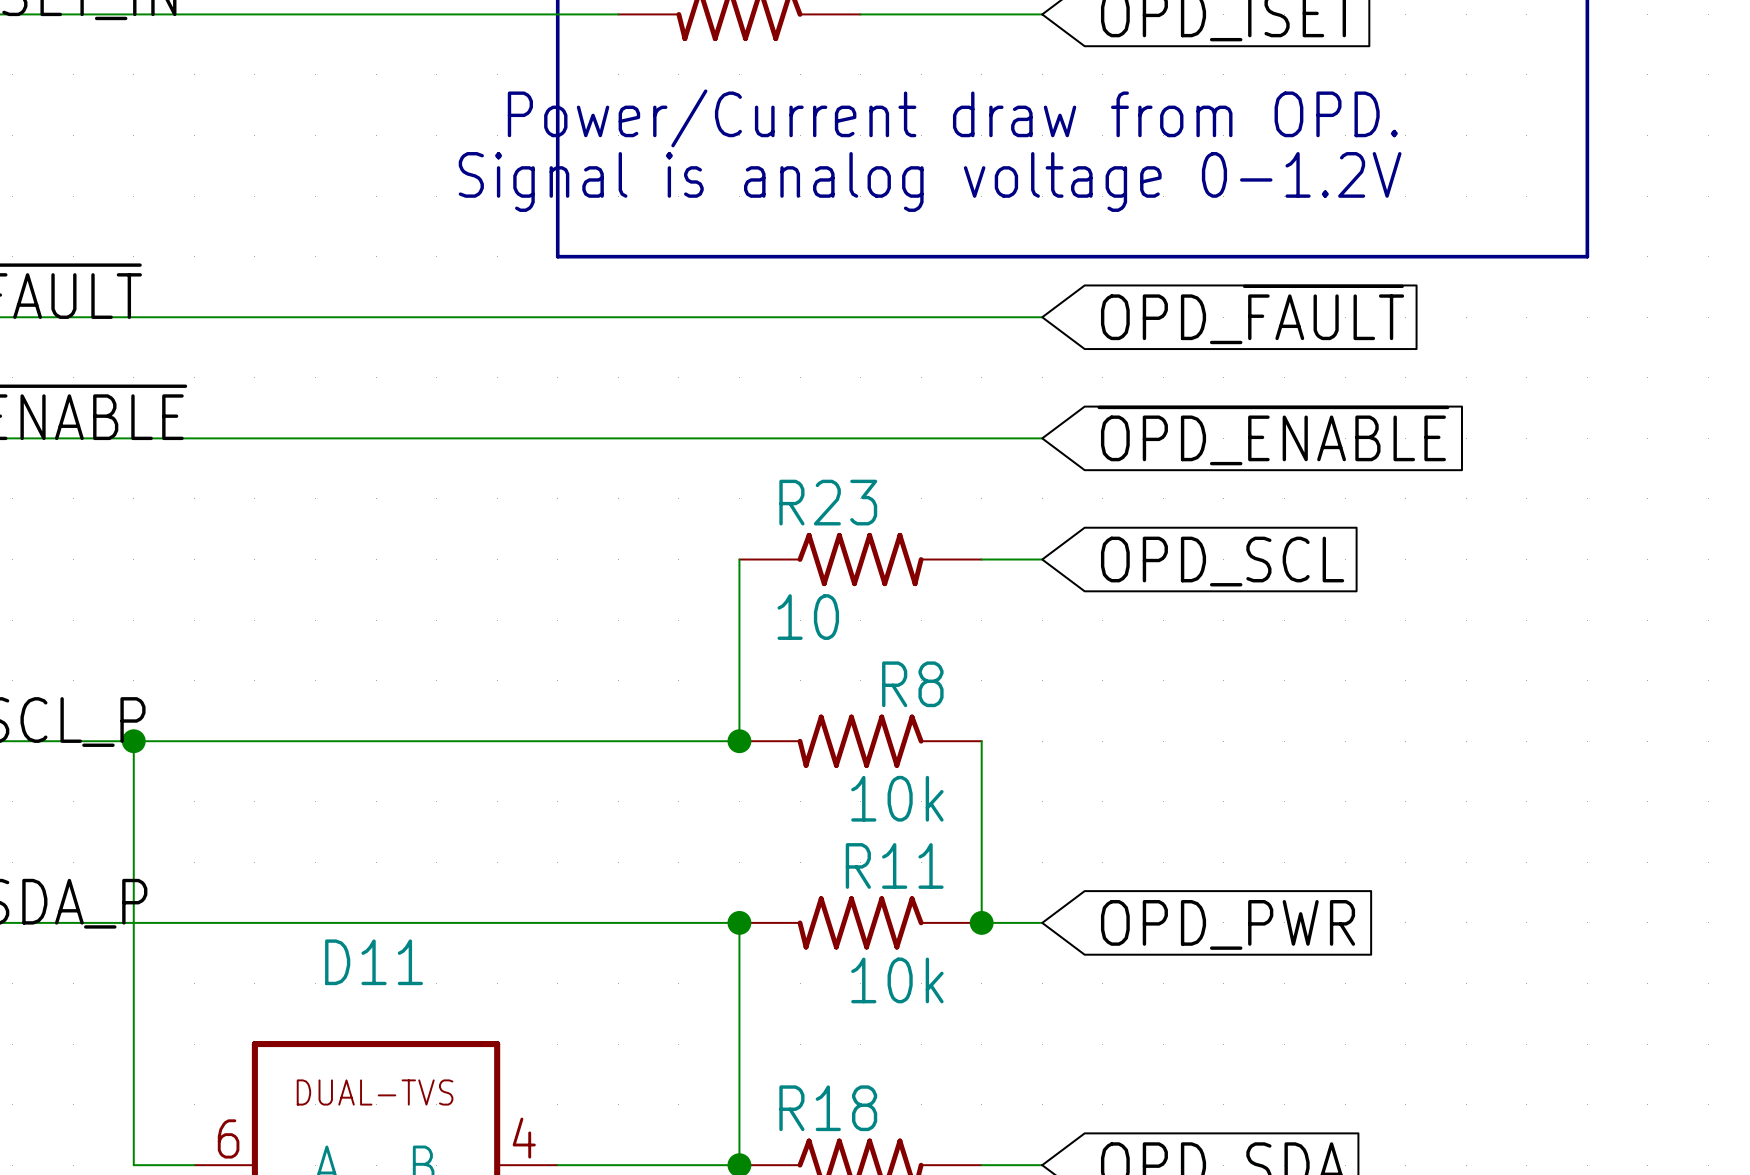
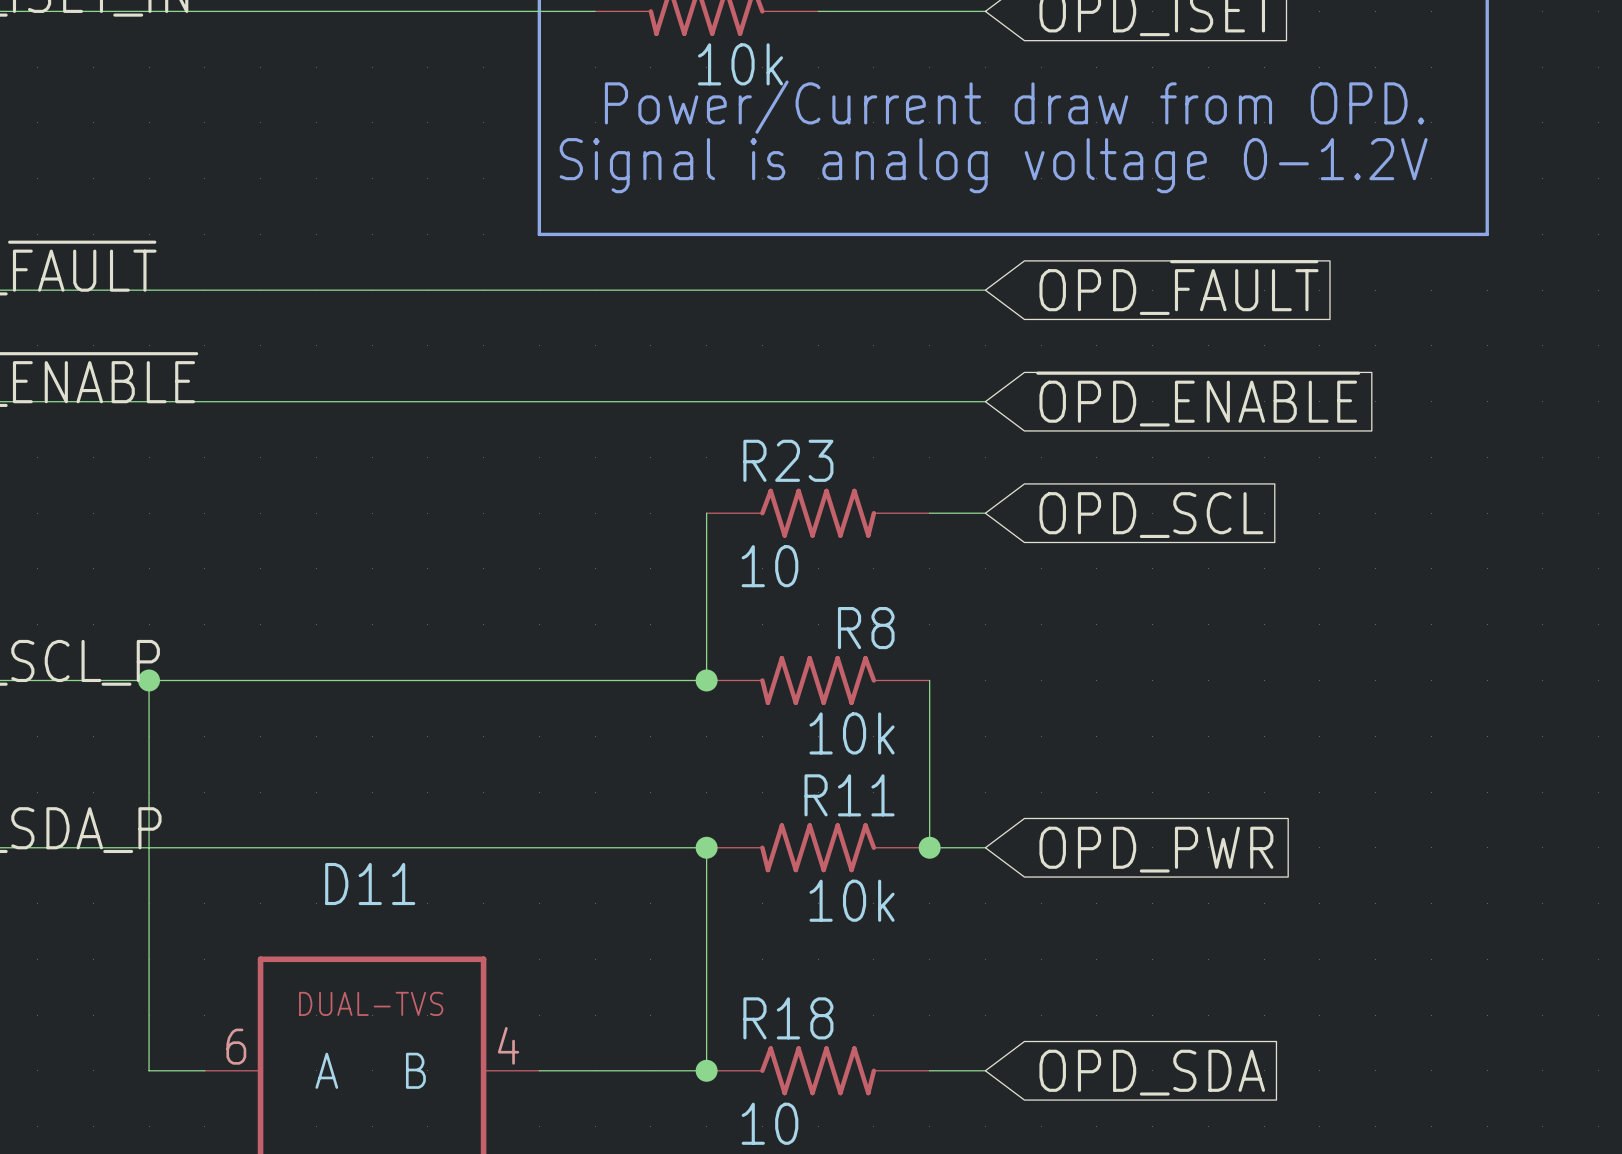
part value: none -> 10k (740, 64)
text position: Power/Current draw from OPD. (952, 118) -> Power/Current draw from OPD. (1014, 107)
text position: Signal is analog voltage 0-1.2V (930, 181) -> Signal is analog voltage 0-1.2V (993, 165)

